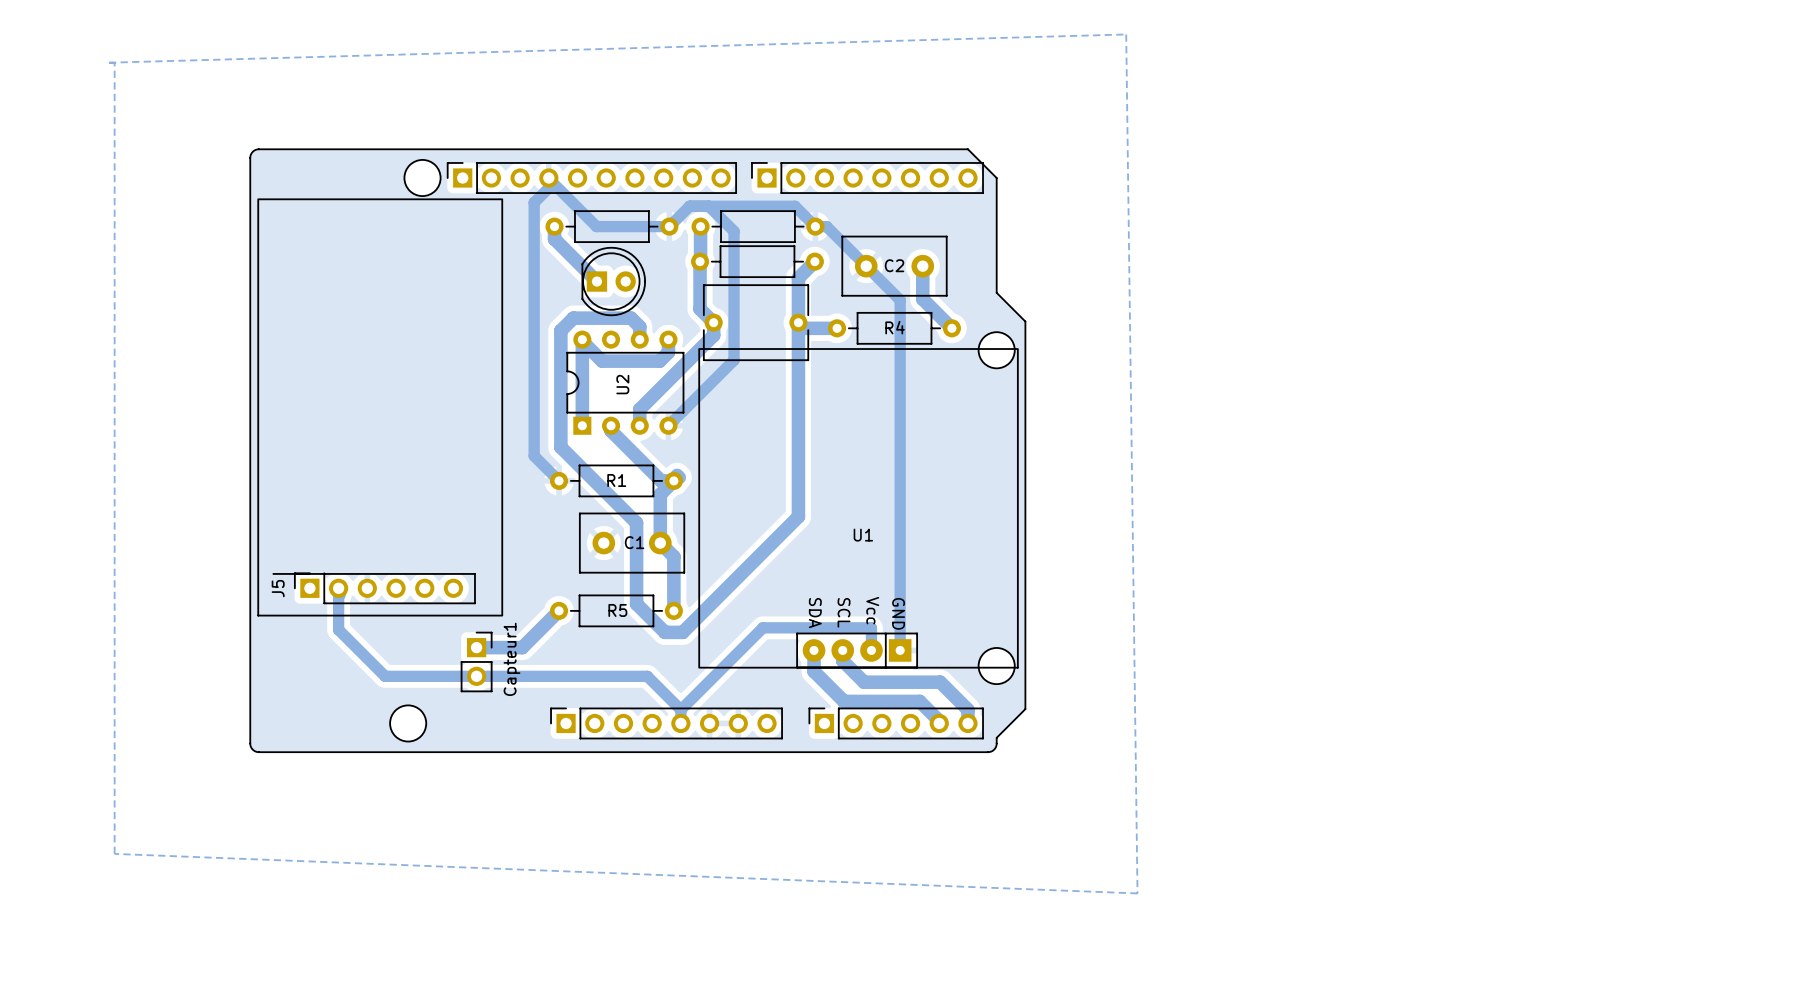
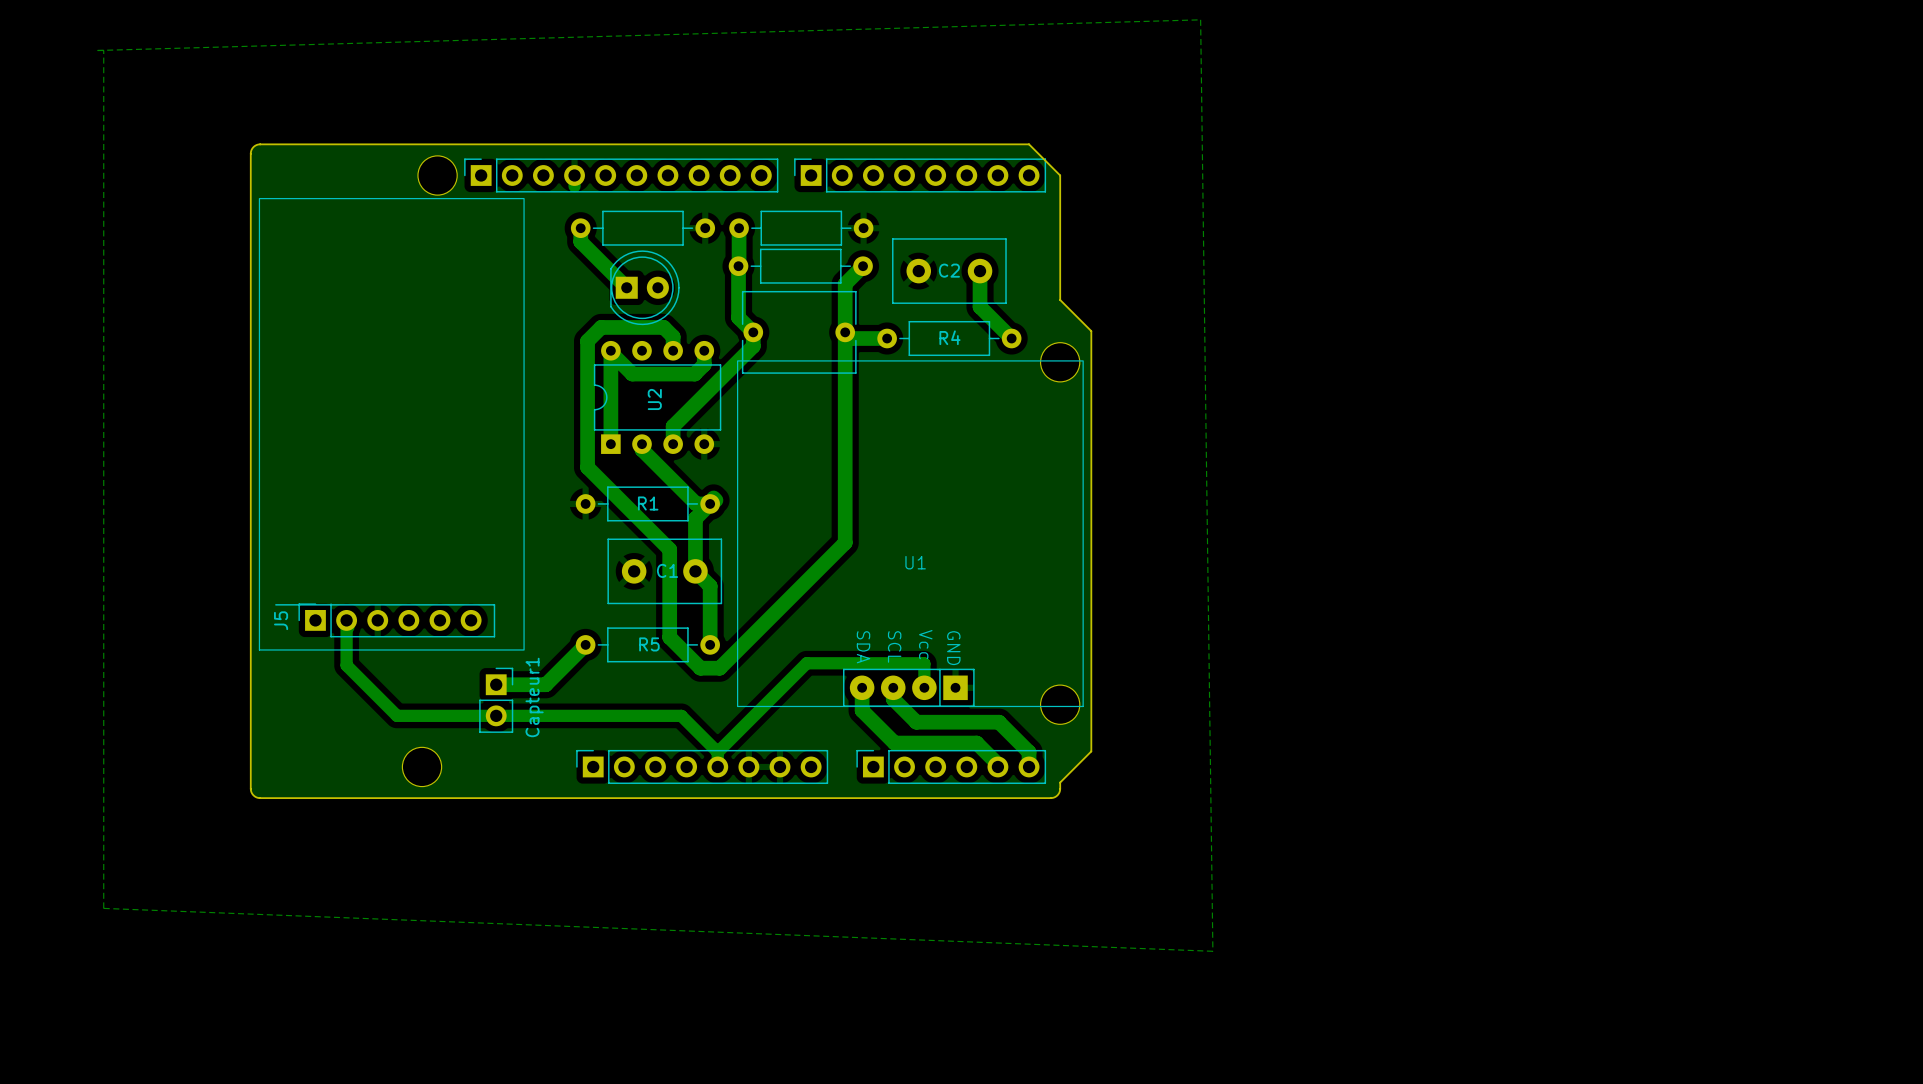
bottom track: (548, 178) (596, 226) (669, 226) (689, 206) (795, 206) (815, 226) (826, 226) (900, 300) (900, 650) -> none
bottom track: (548, 187) (534, 202) (534, 456) (559, 480) -> none
bottom track: (708, 206) (734, 231) (734, 360) (668, 425) -> none

